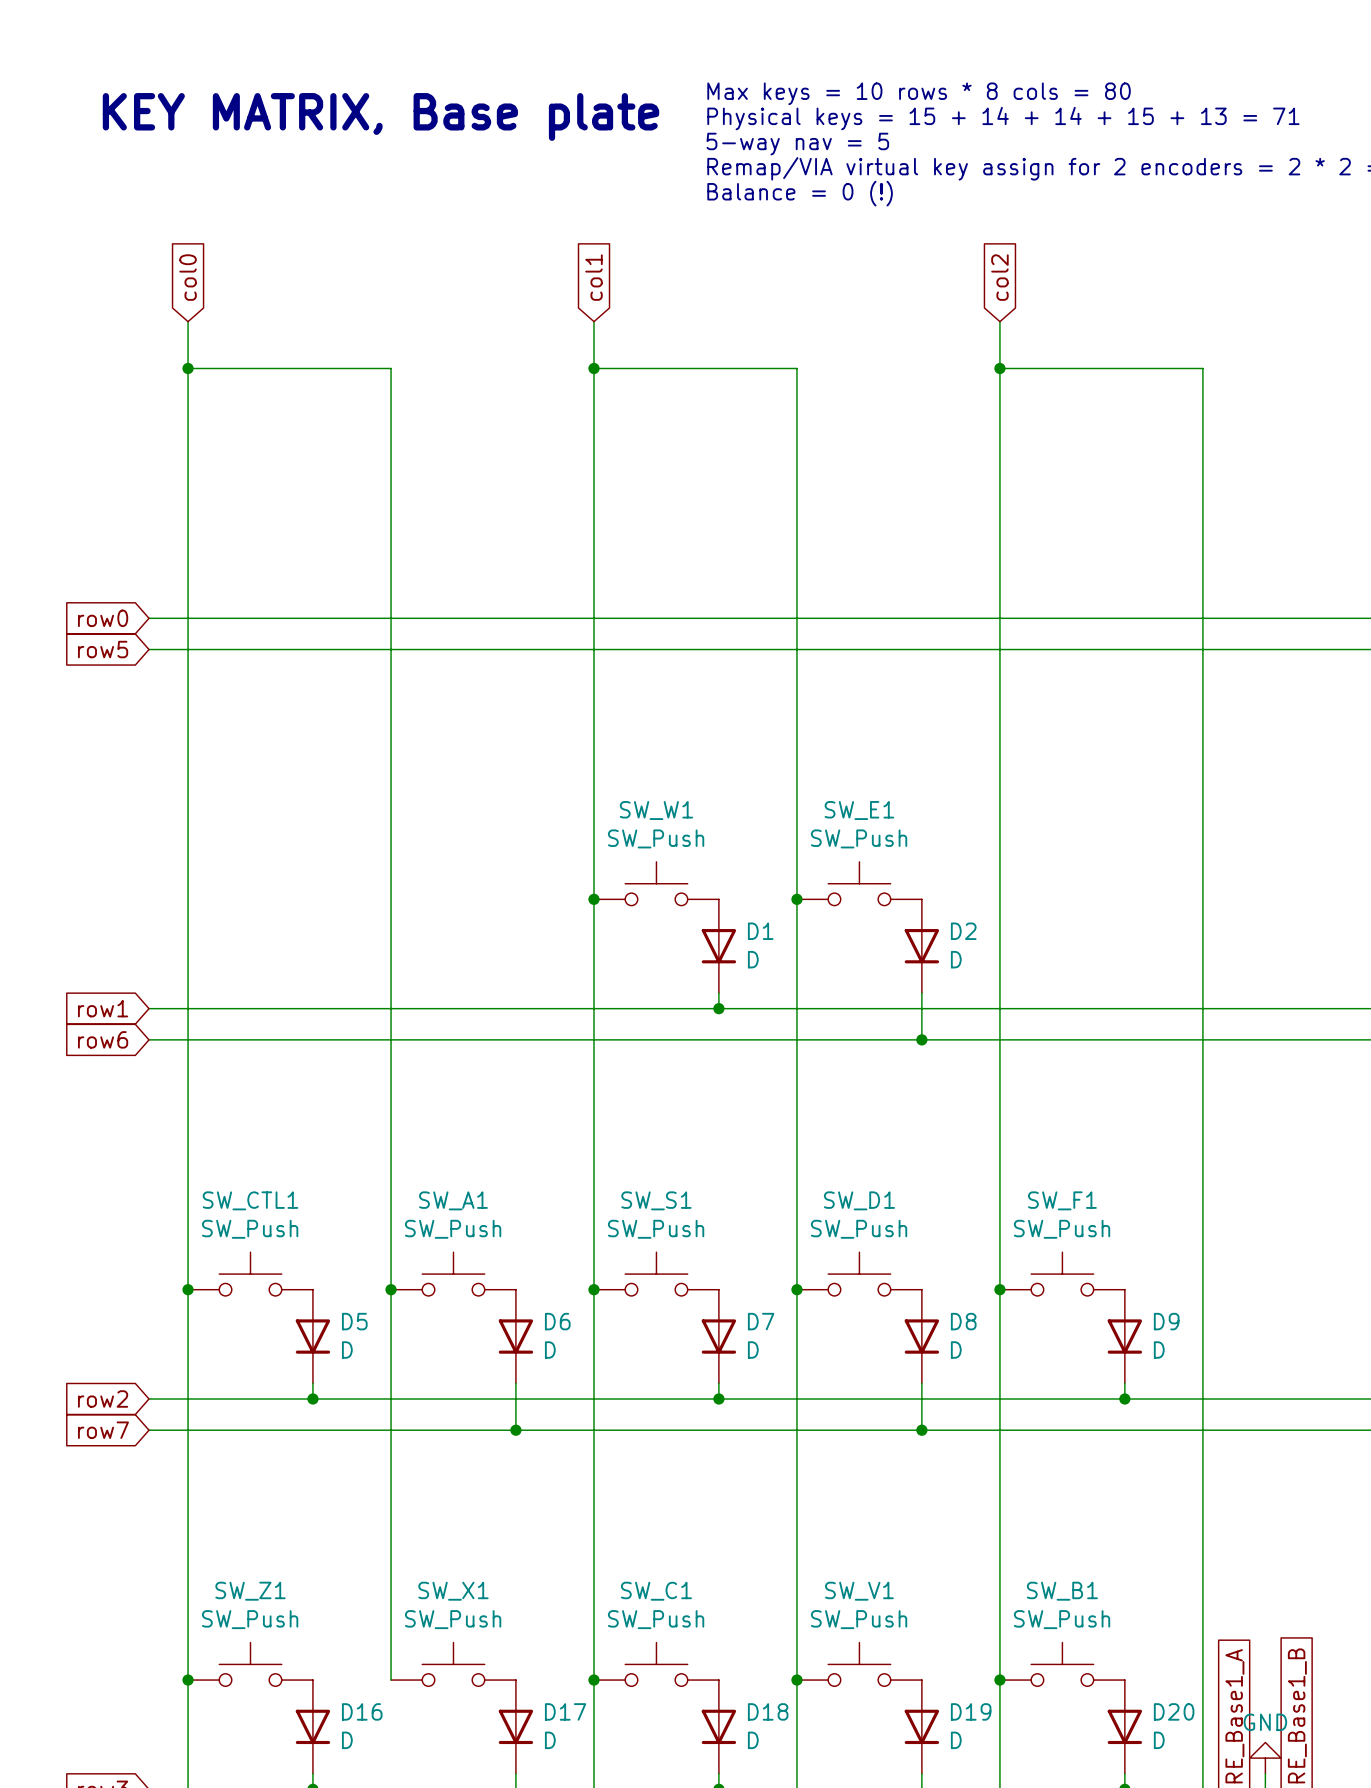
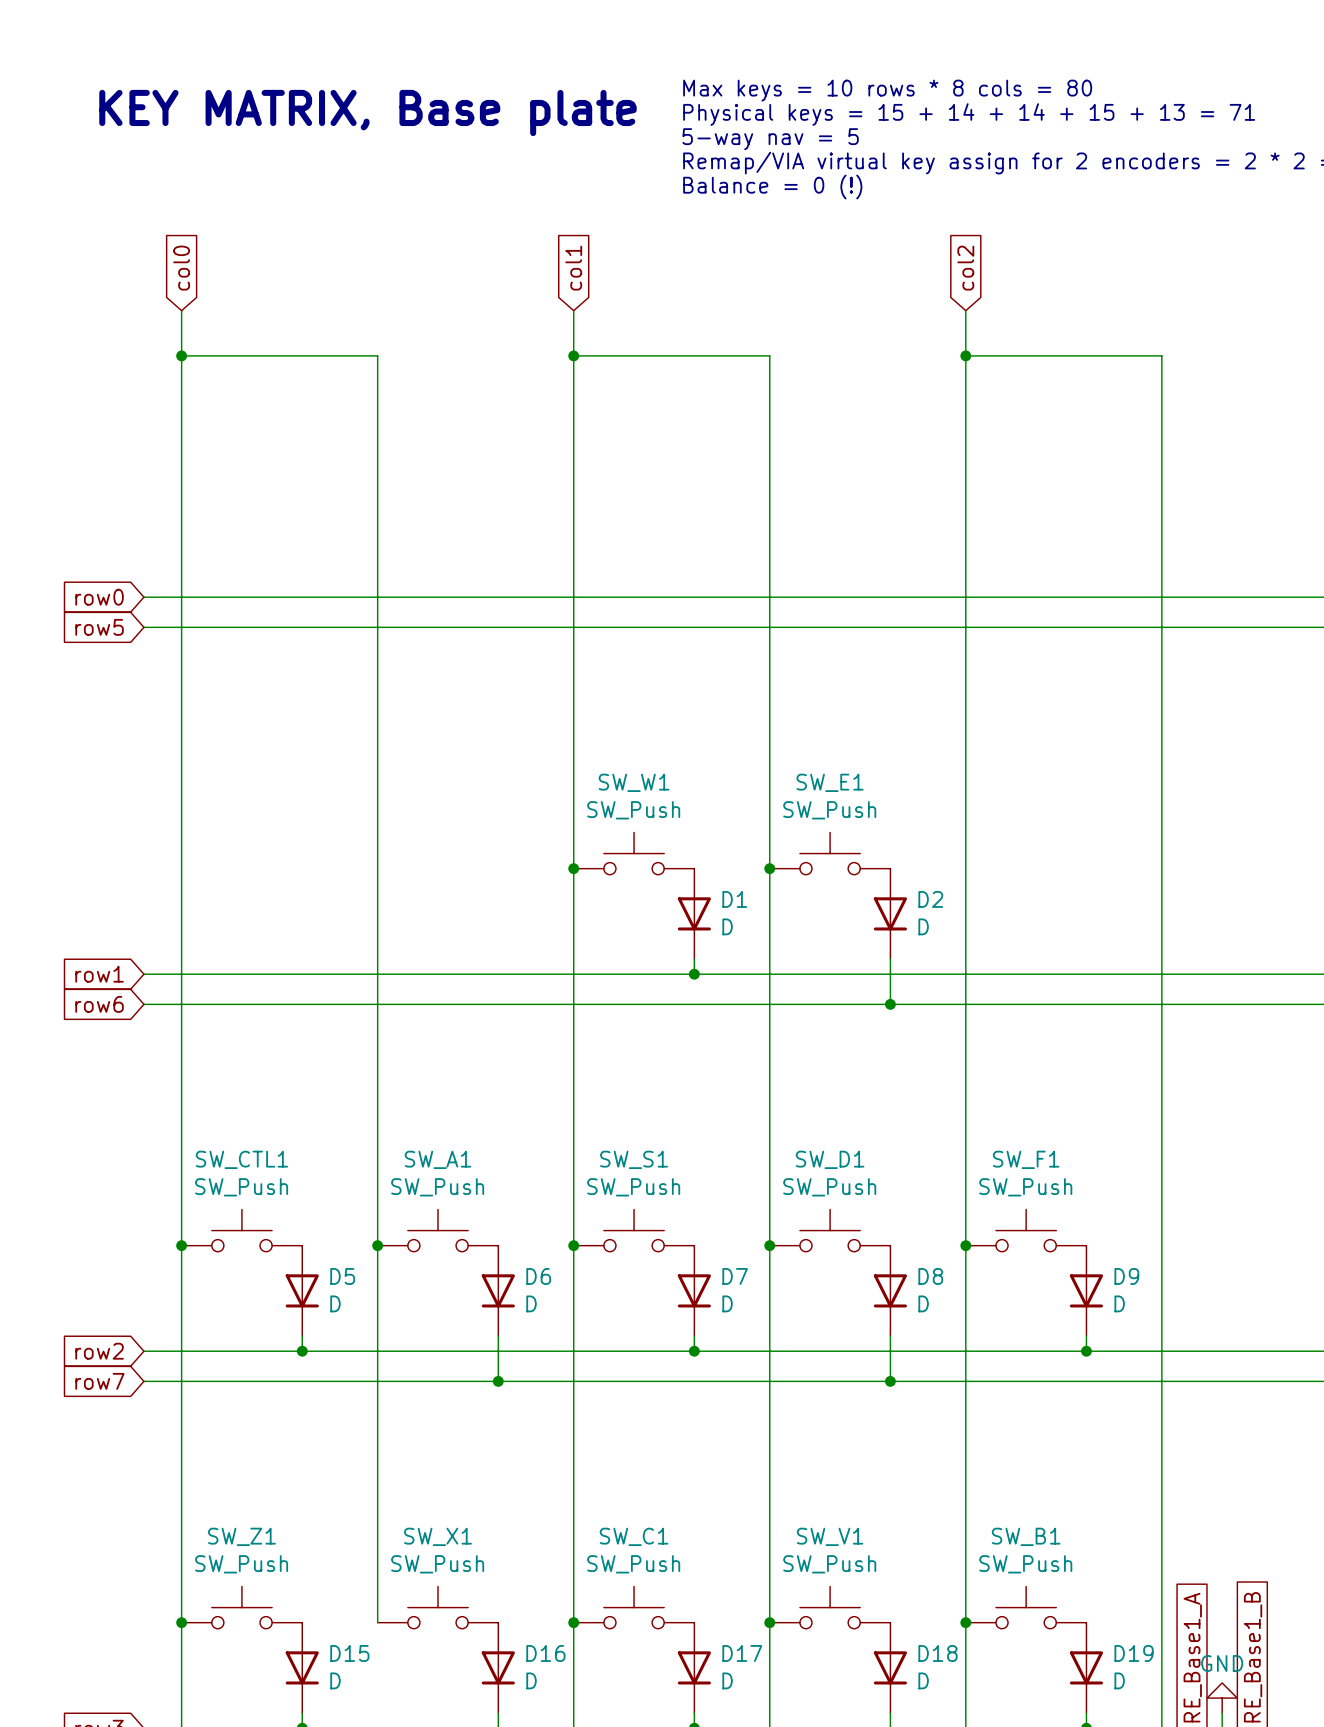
D16 name: D16 (362, 1711) -> D15 (349, 1653)
D17 name: D17 (565, 1711) -> D16 (545, 1653)
D18 name: D18 (768, 1711) -> D17 (742, 1653)
D19 name: D19 (971, 1711) -> D18 (937, 1653)
D20 name: D20 (1174, 1711) -> D19 (1134, 1653)

